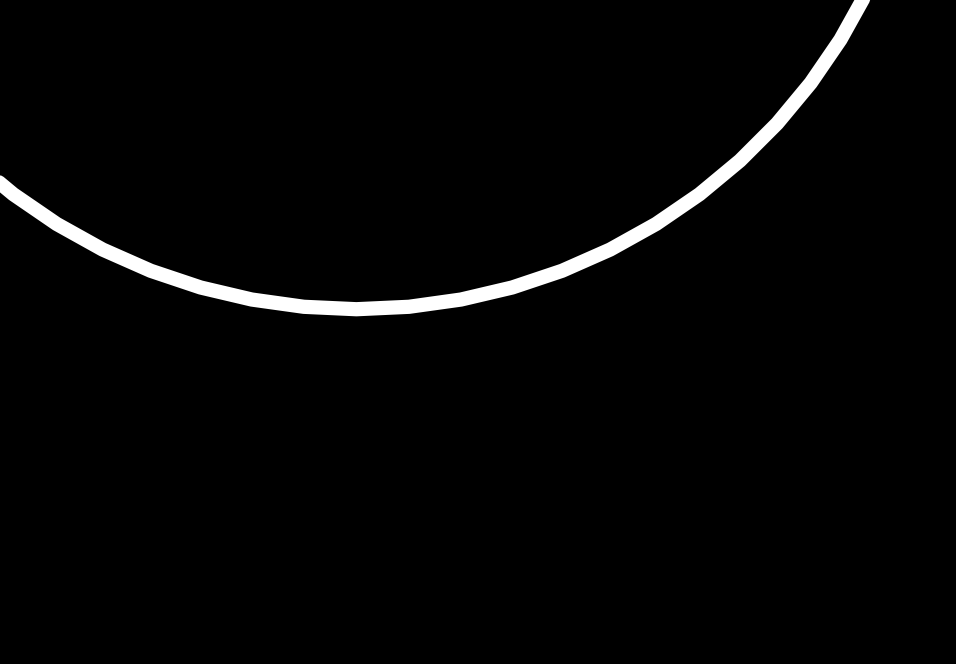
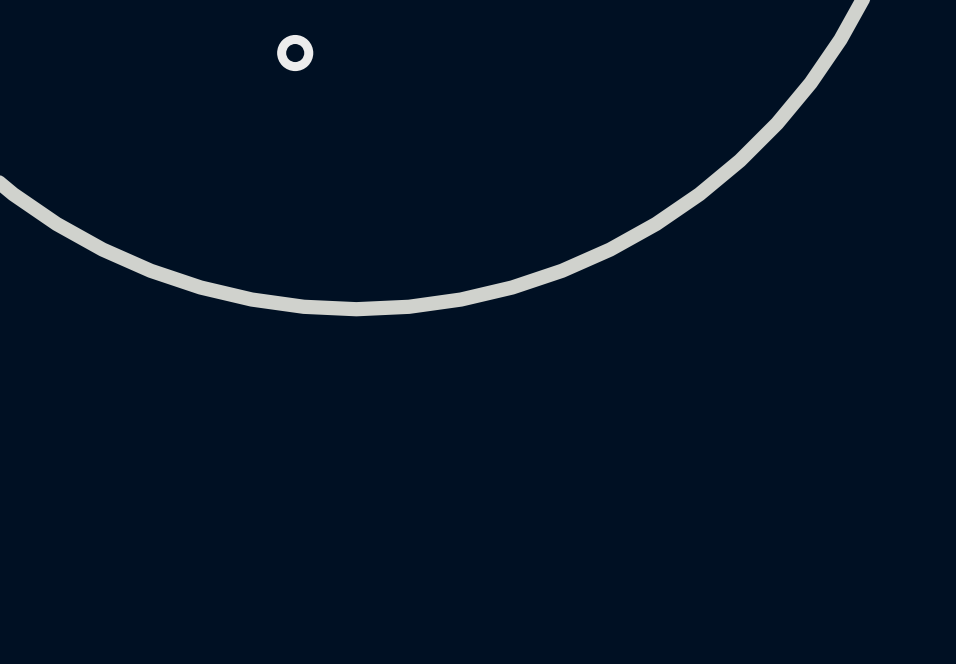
via: none -> (295, 53)

